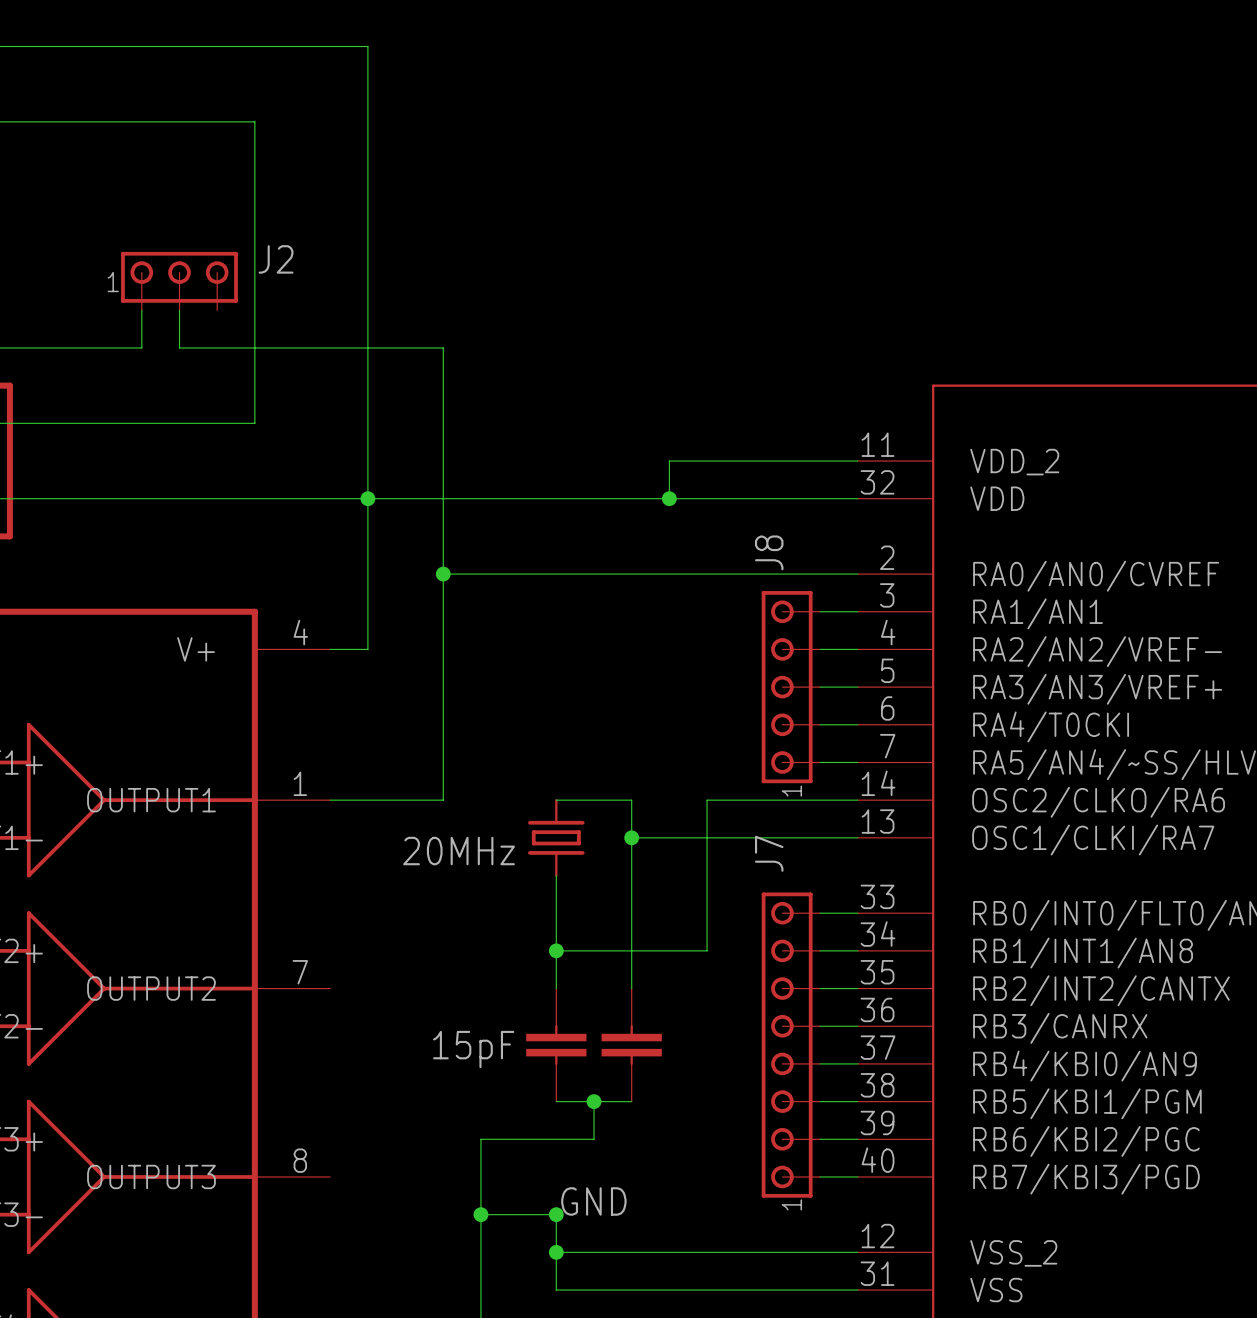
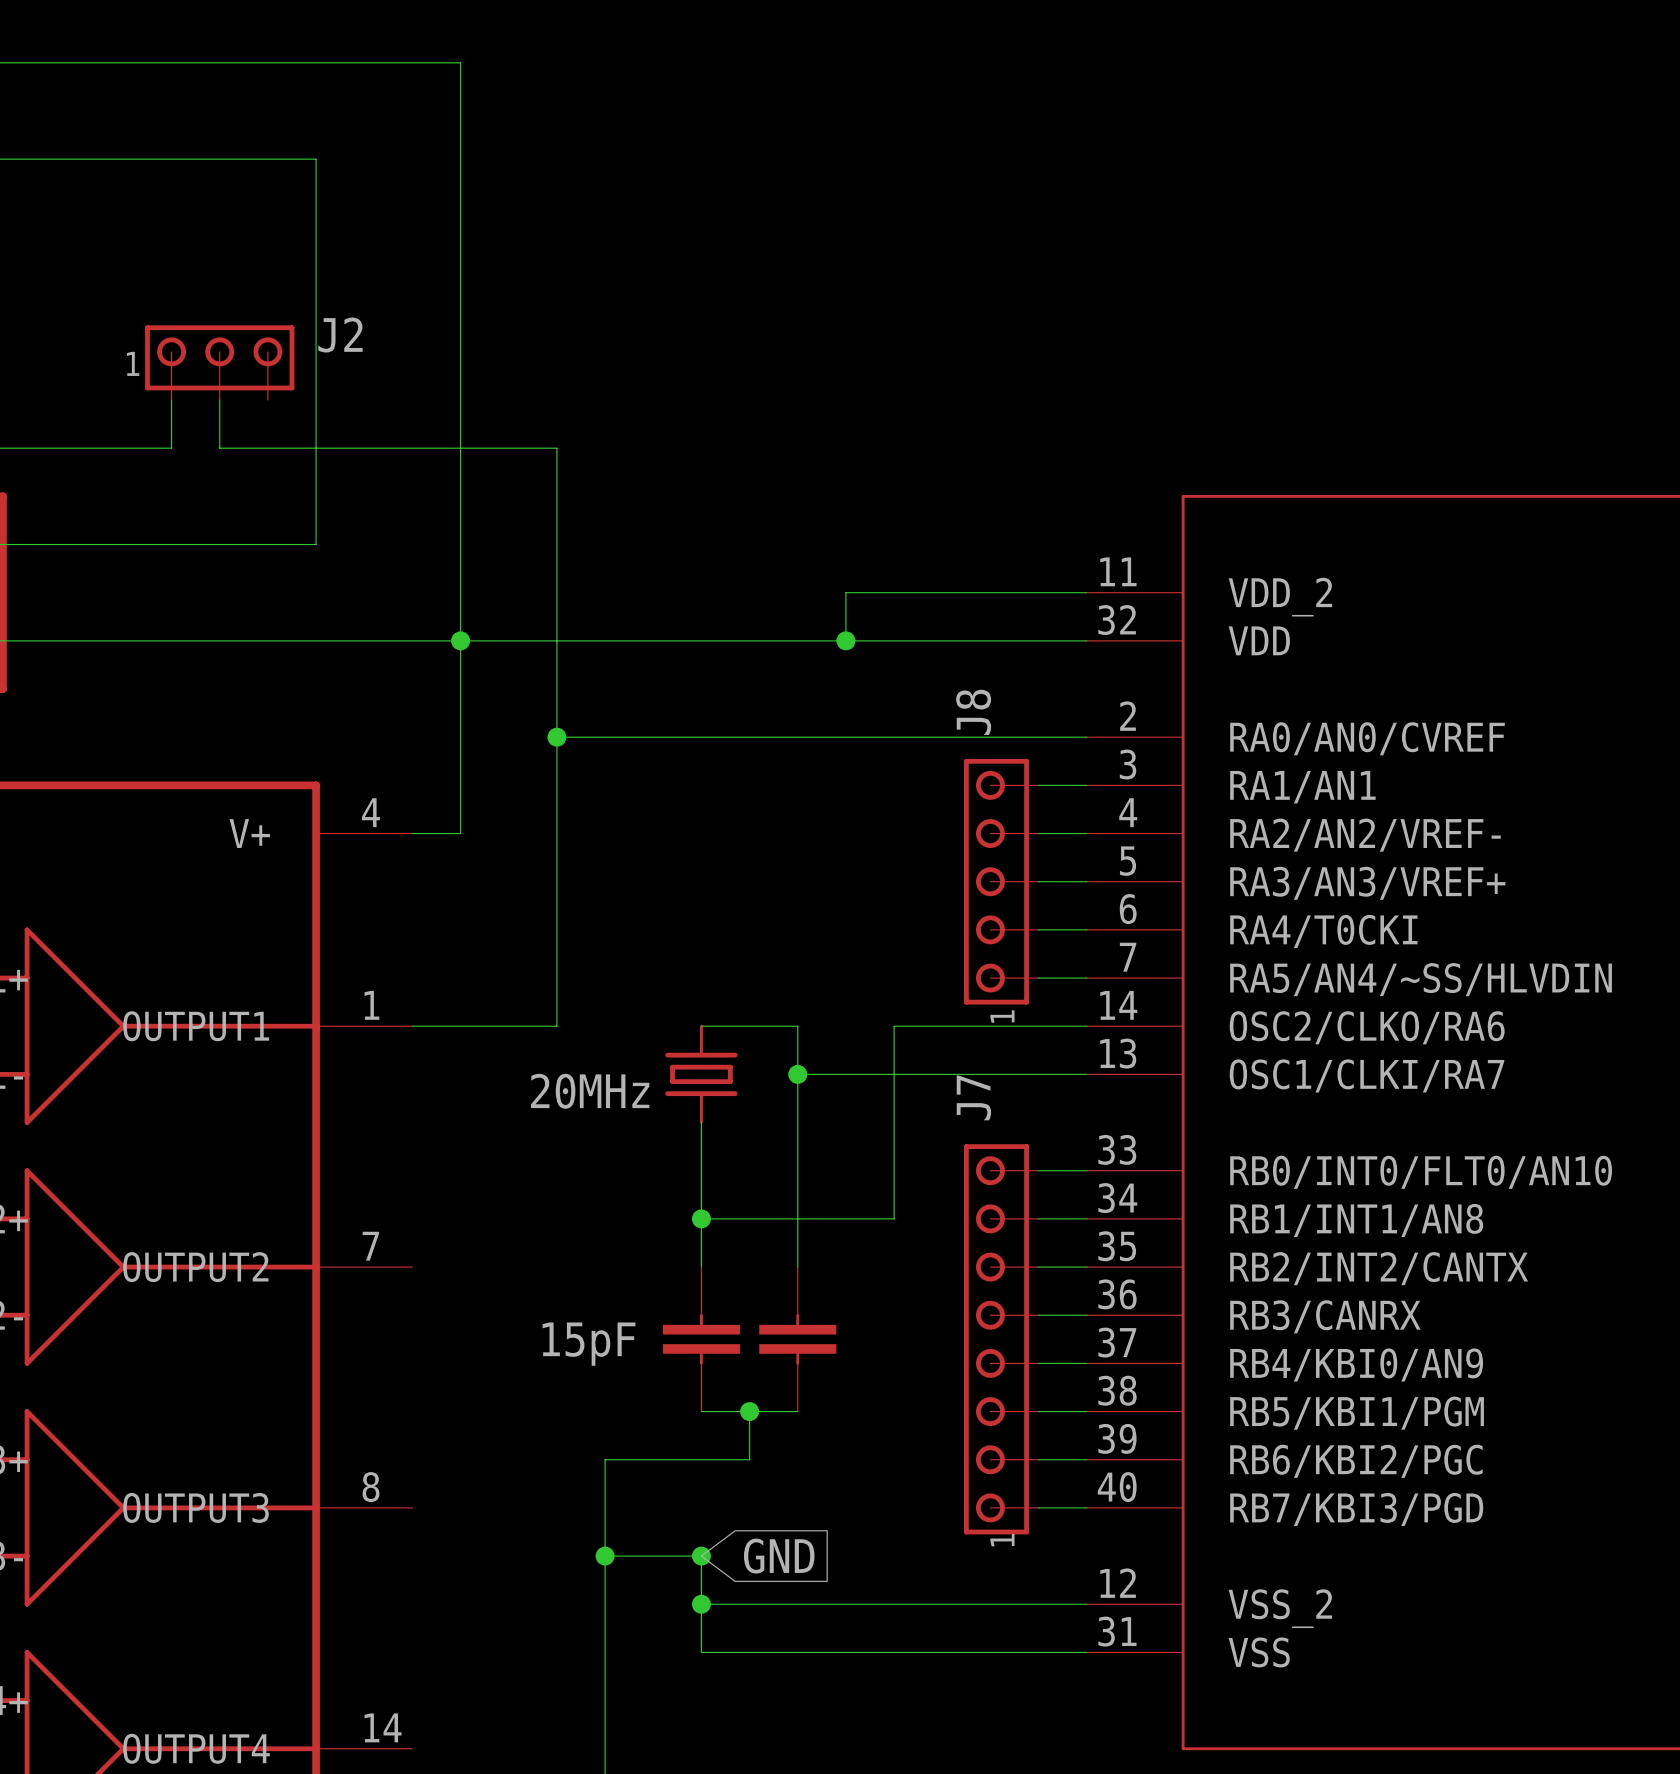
label: GND (593, 1201) -> none
global label: none -> GND (779, 1556)

